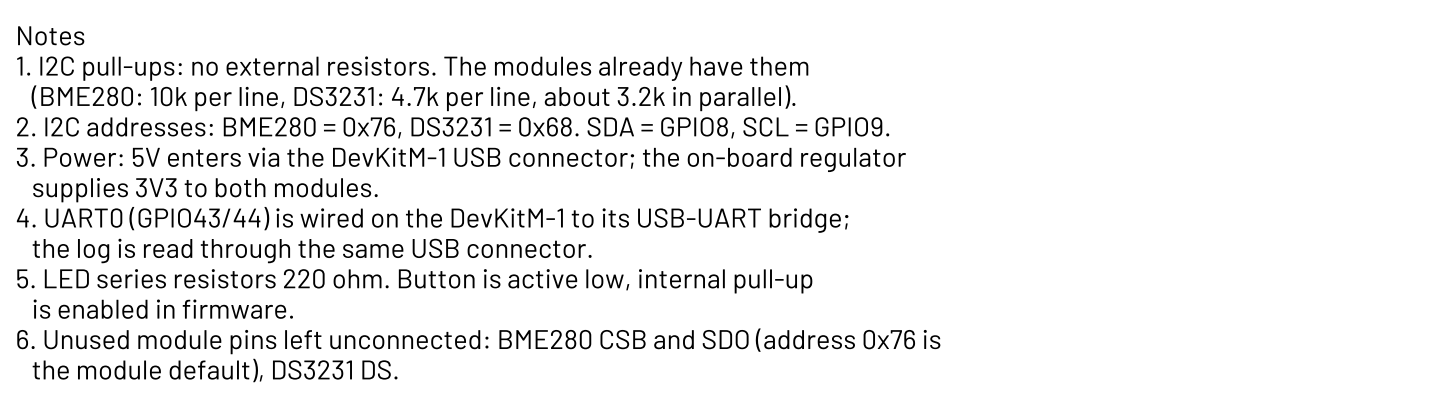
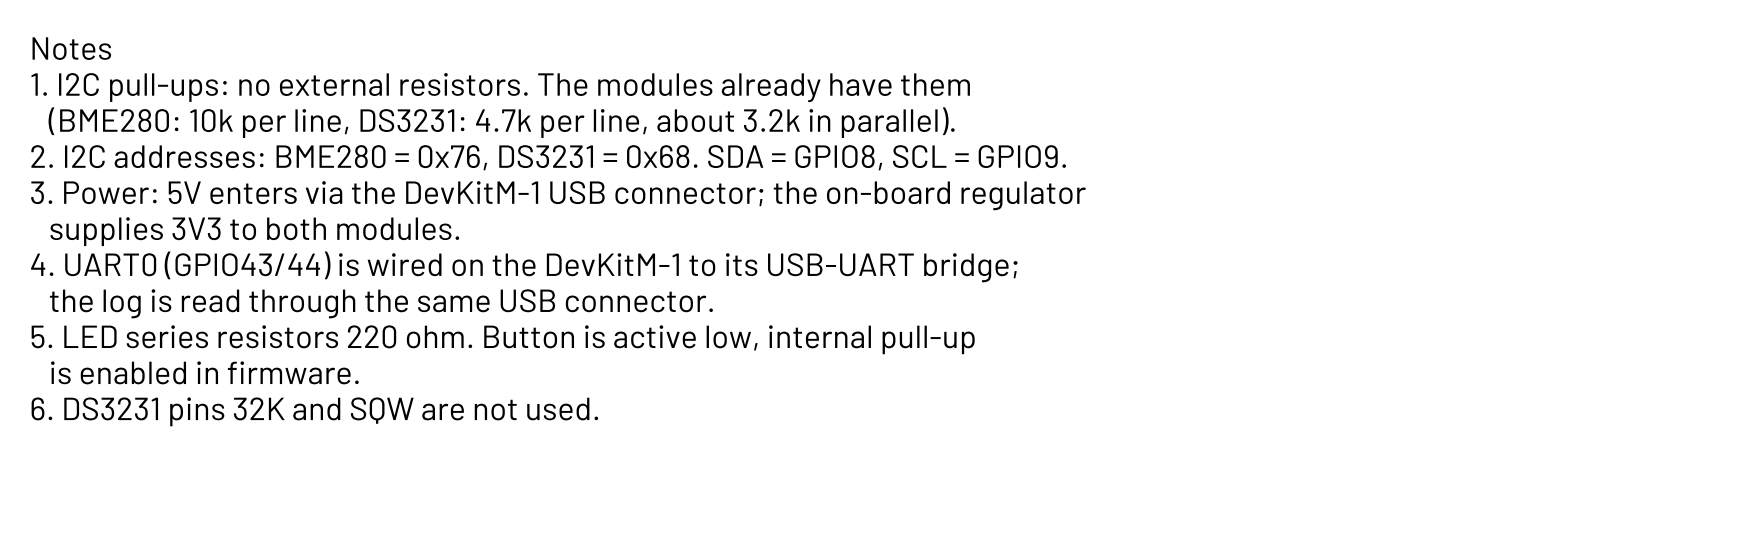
text: 6. Unused module pins left unconnected: BME280 CSB and SDO (address 0x76 is (478, 341) -> 6. DS3231 pins 32K and SQW are not used. (314, 411)
text: the module default), DS3231 DS. (215, 370) -> none

